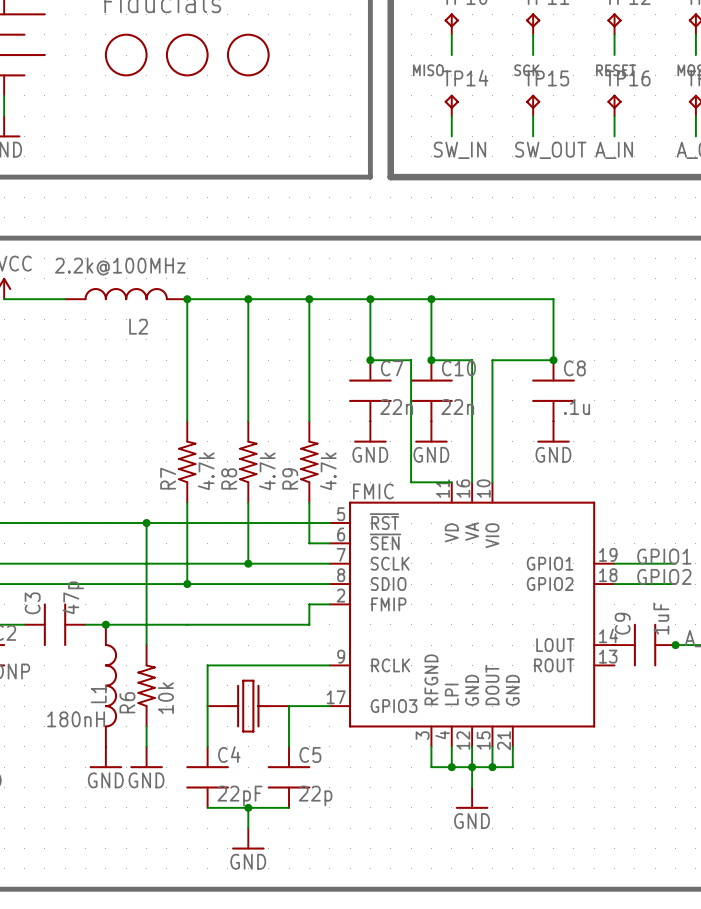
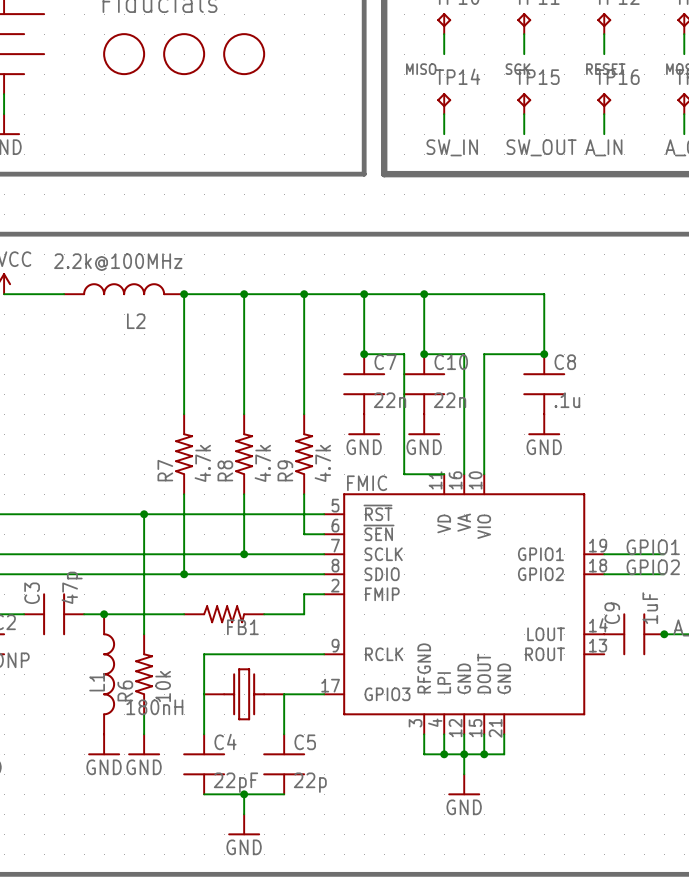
FB1: none -> (224, 614)
L1 value position: 180nH (76, 719) -> 180nH (154, 707)

